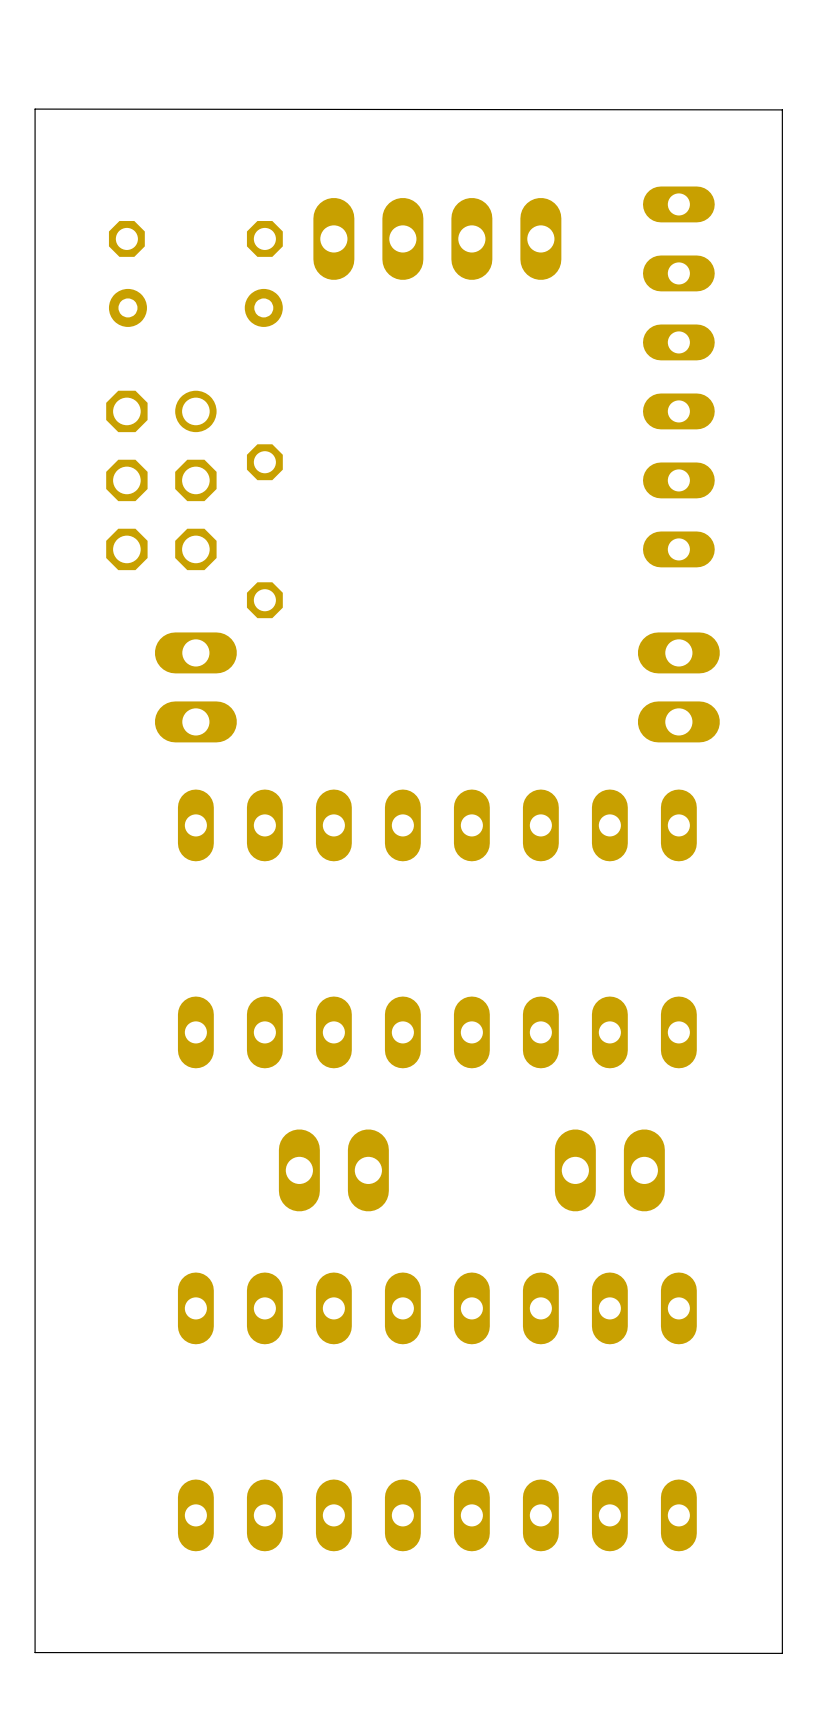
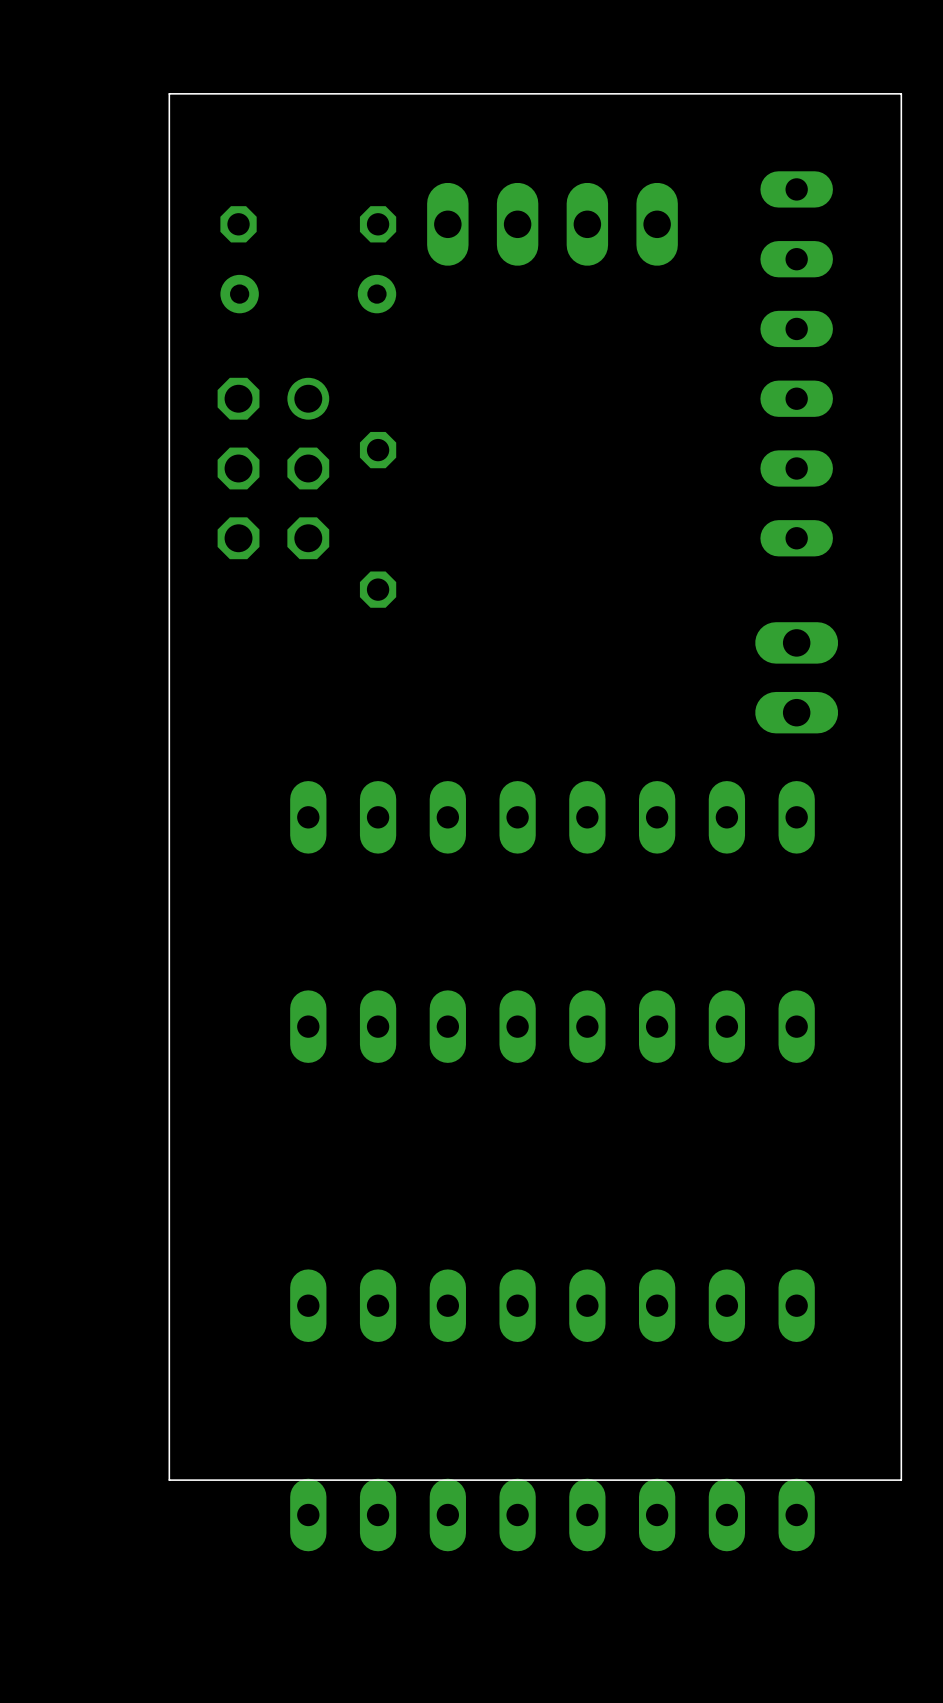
board edge: (782, 109) (35, 109) (35, 1652) (782, 1653) (782, 1480) -> (901, 93) (169, 93) (169, 1480) (901, 1480)
part: (195, 687) -> none
part: (333, 1170) -> none
part: (609, 1170) -> none

